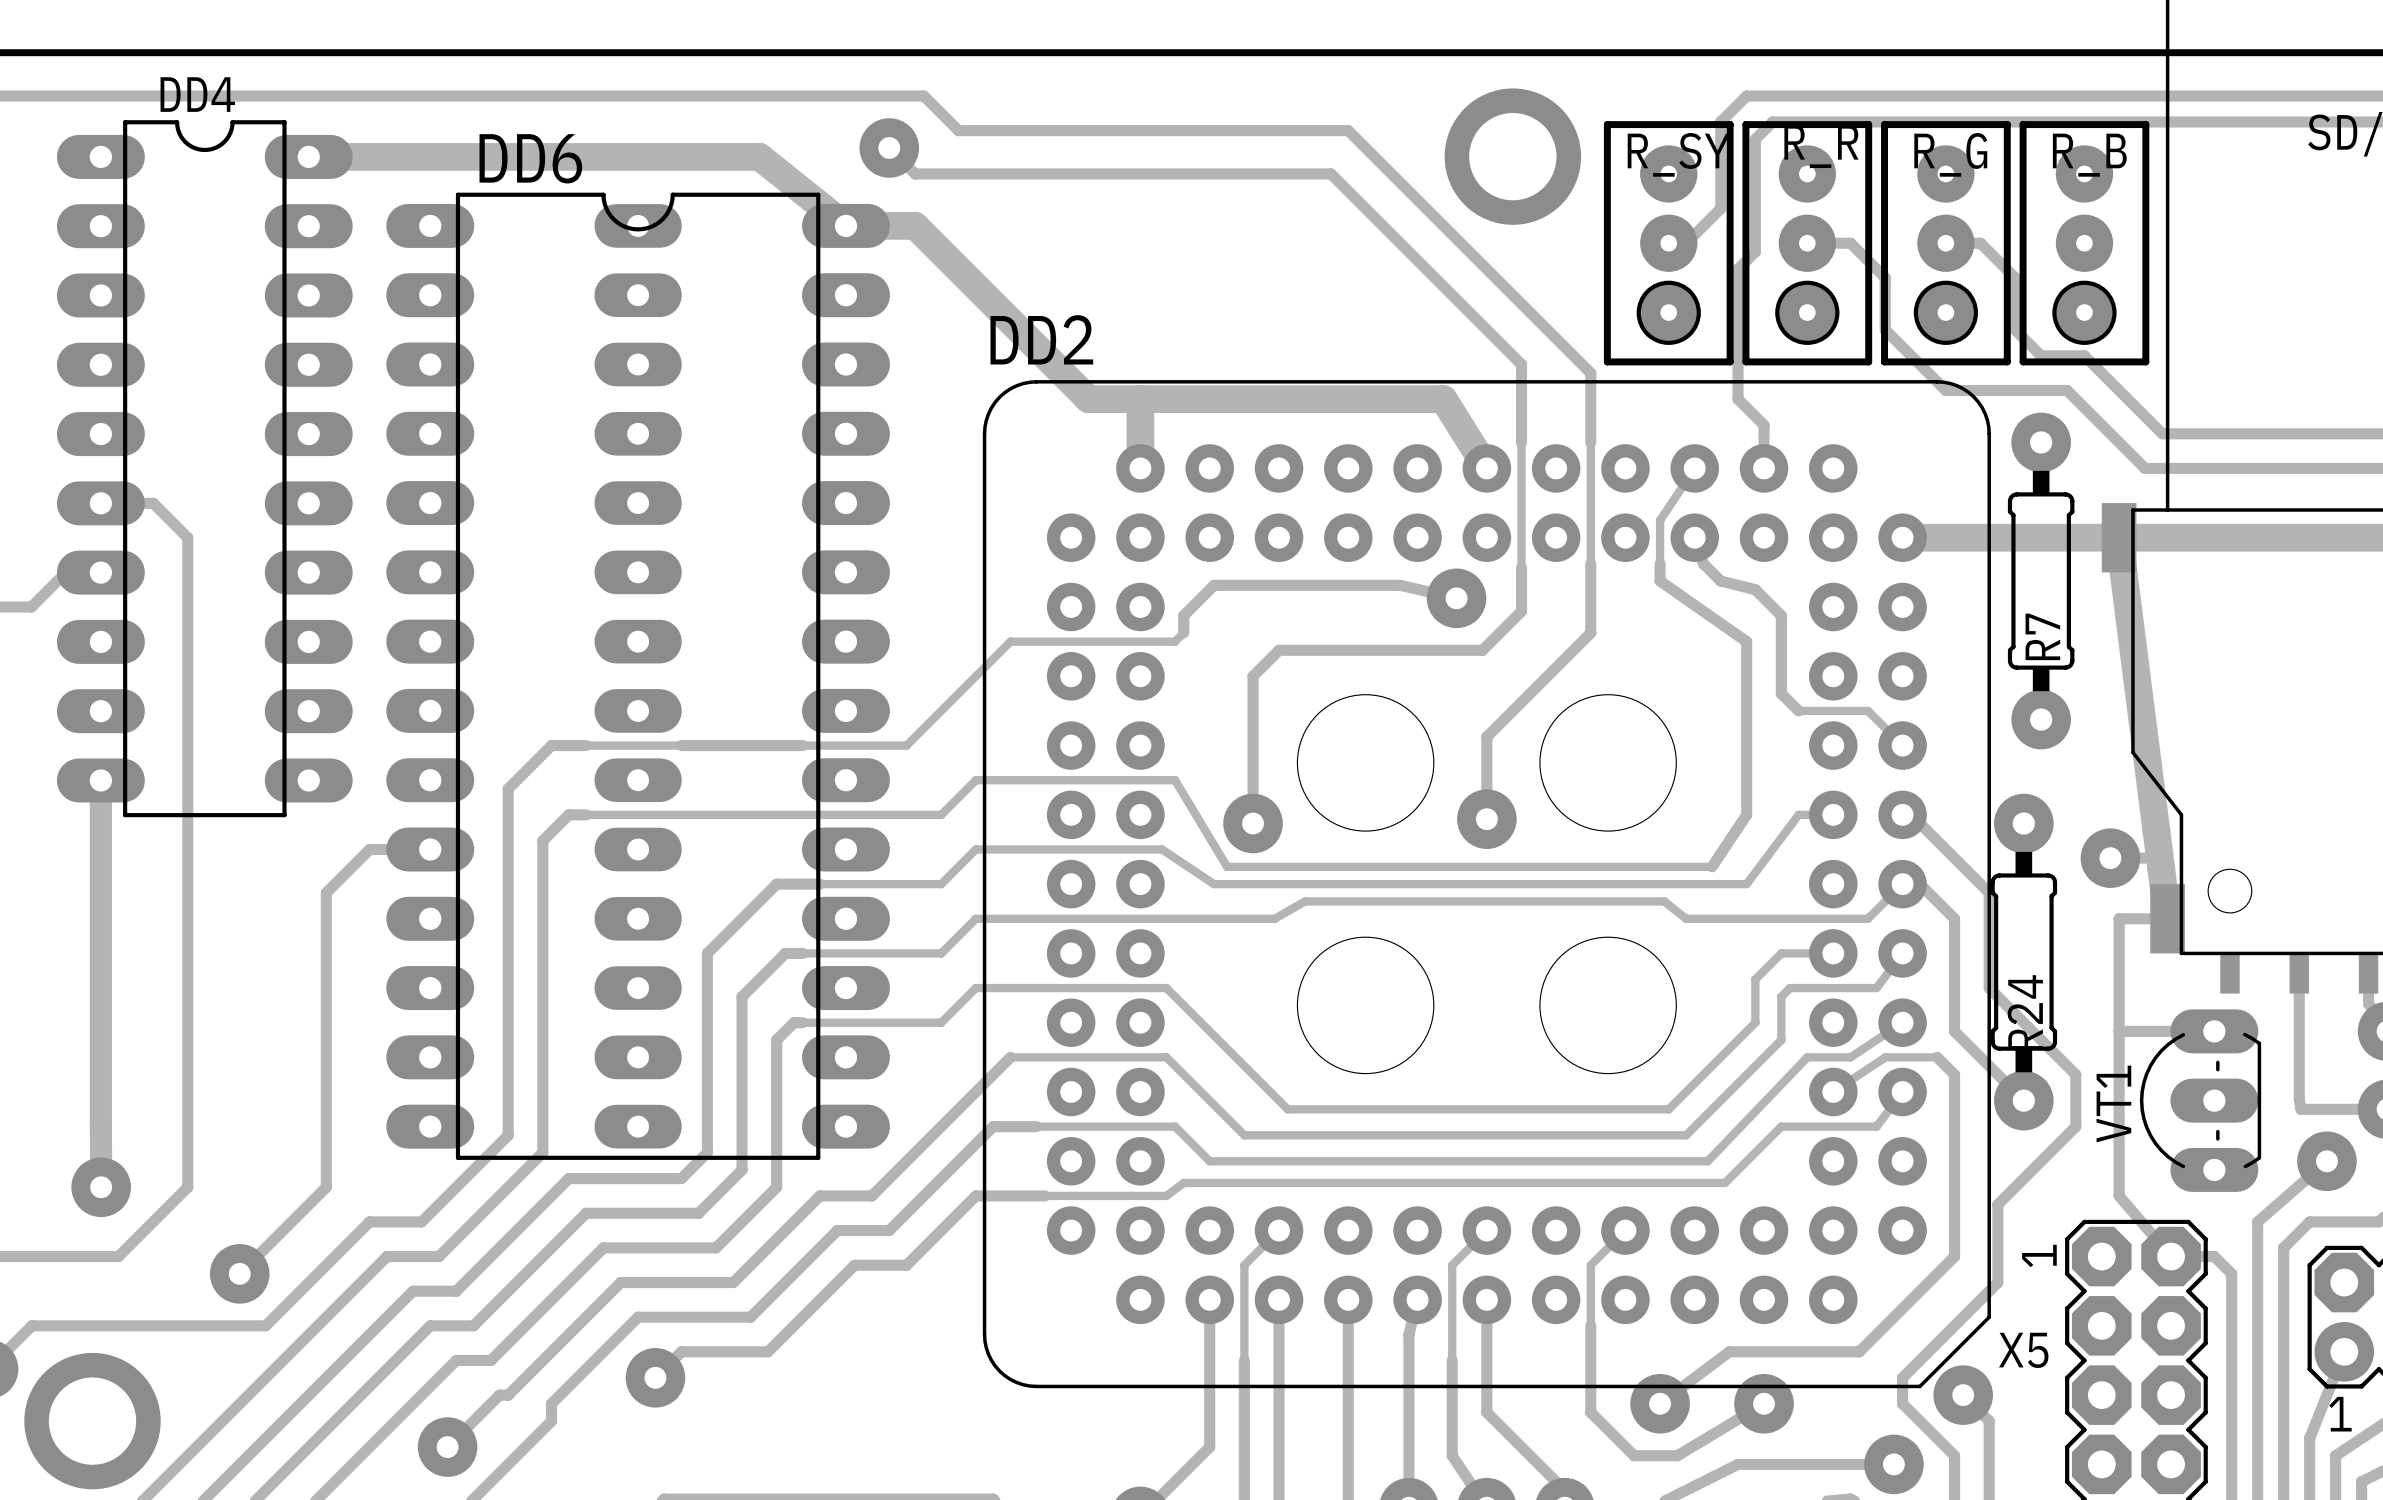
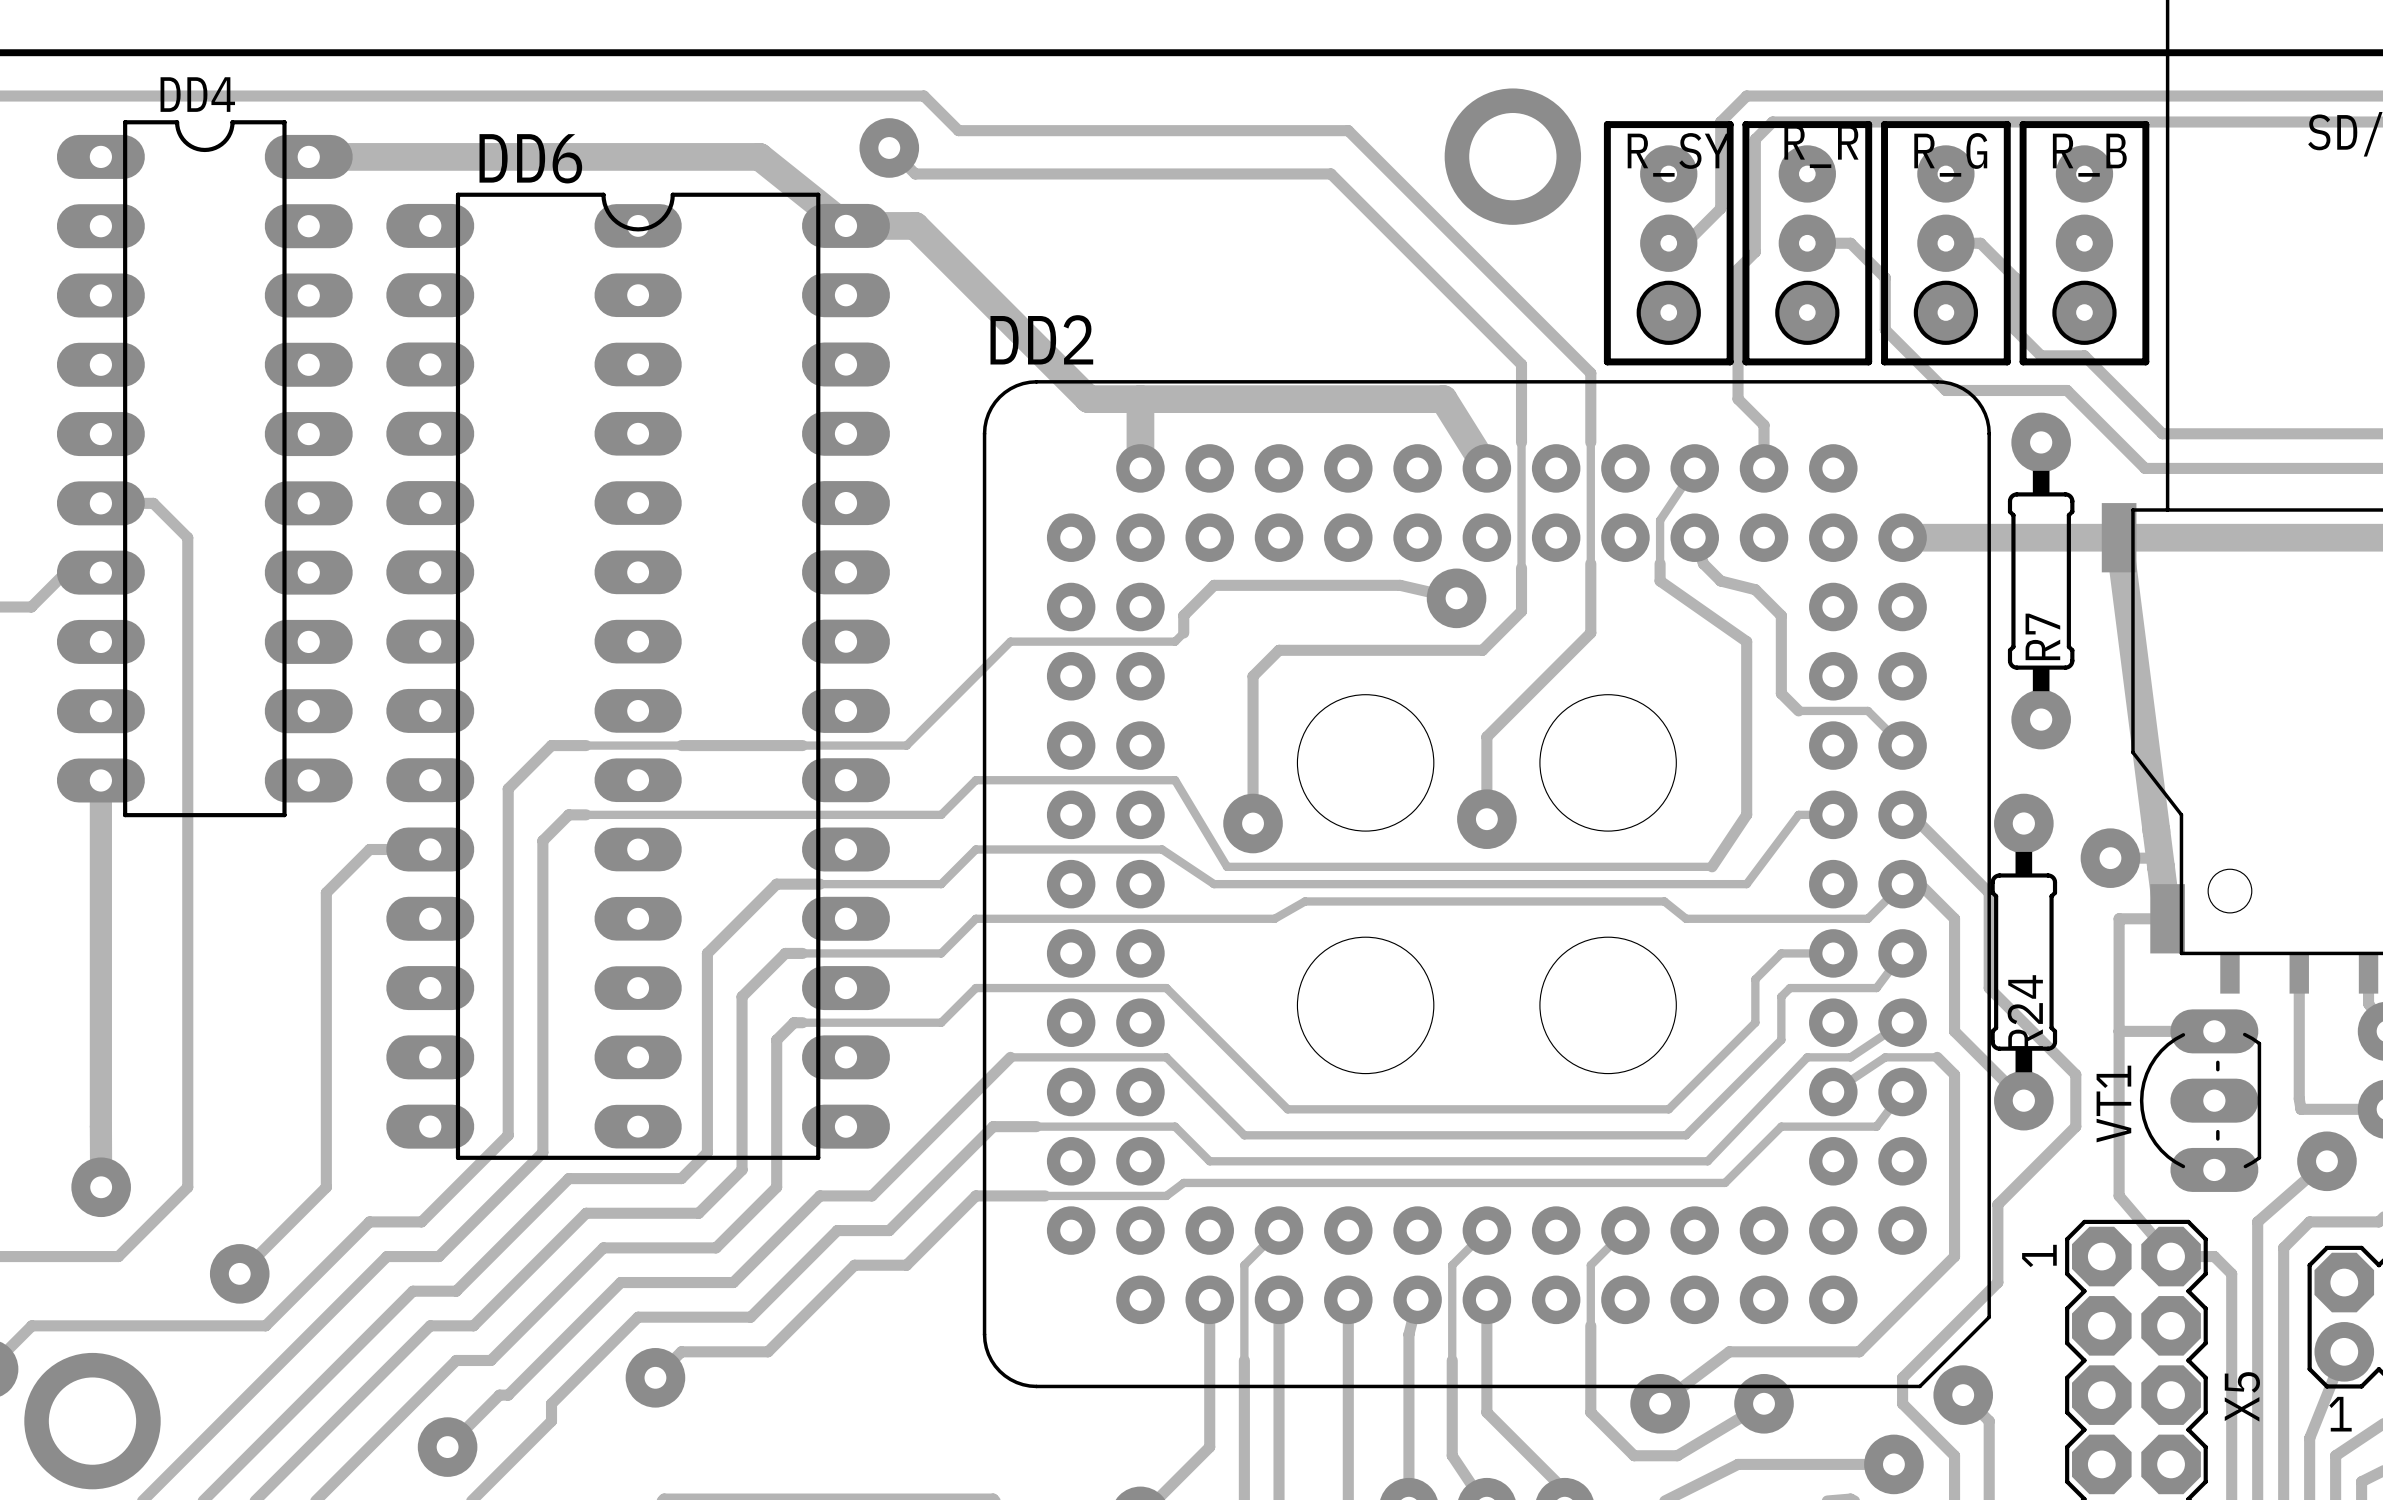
X5 name rotation: 0° (2023, 1350) -> 90° counterclockwise (2242, 1396)
X5 name position: X5 (2023, 1350) -> X5 (2242, 1396)

